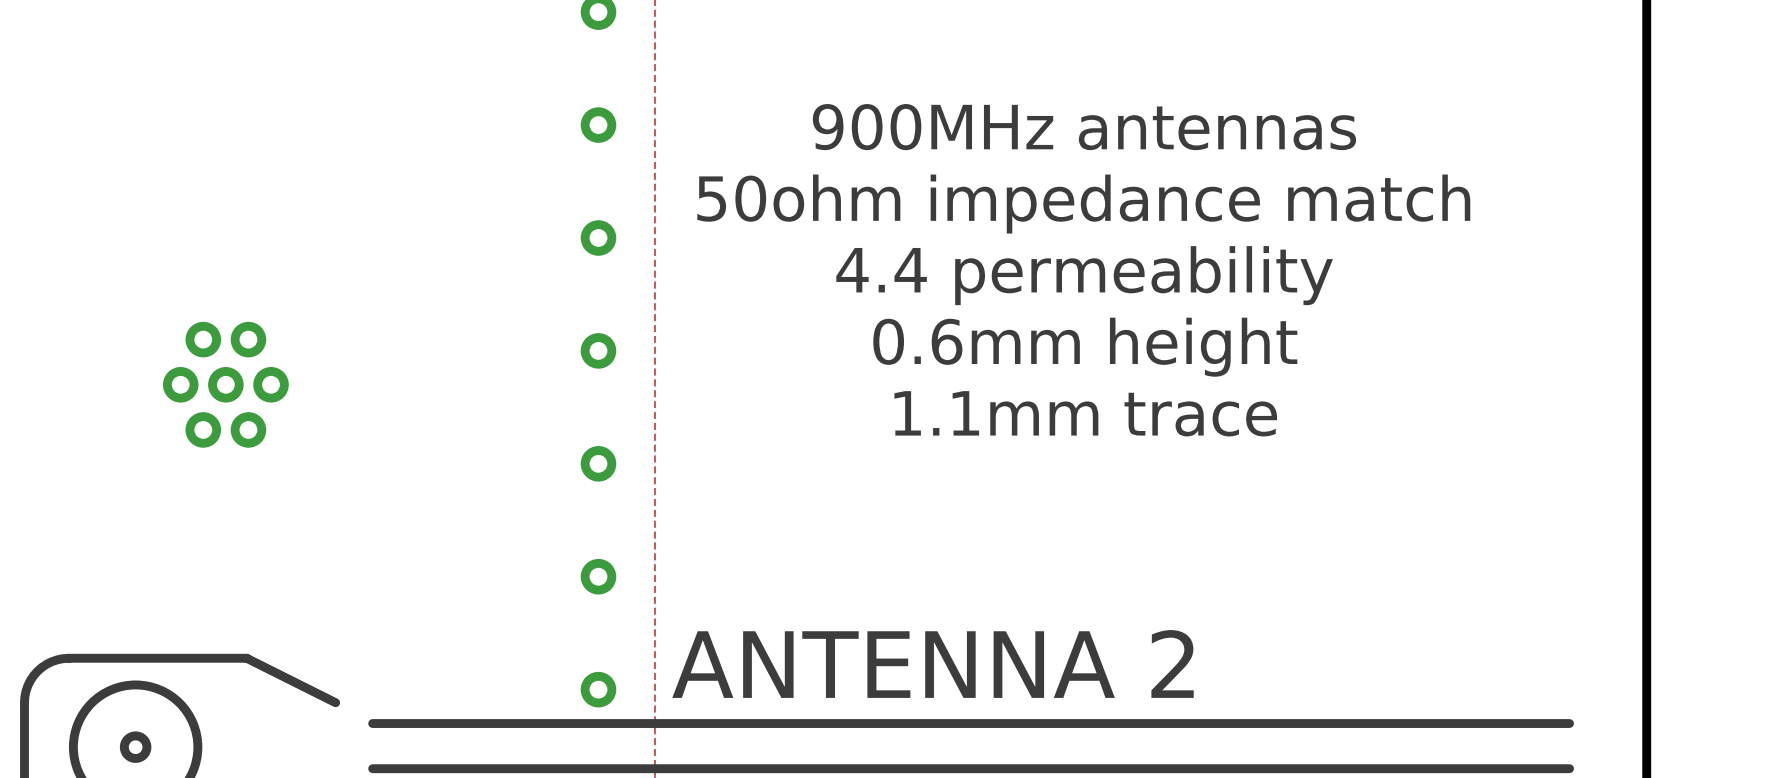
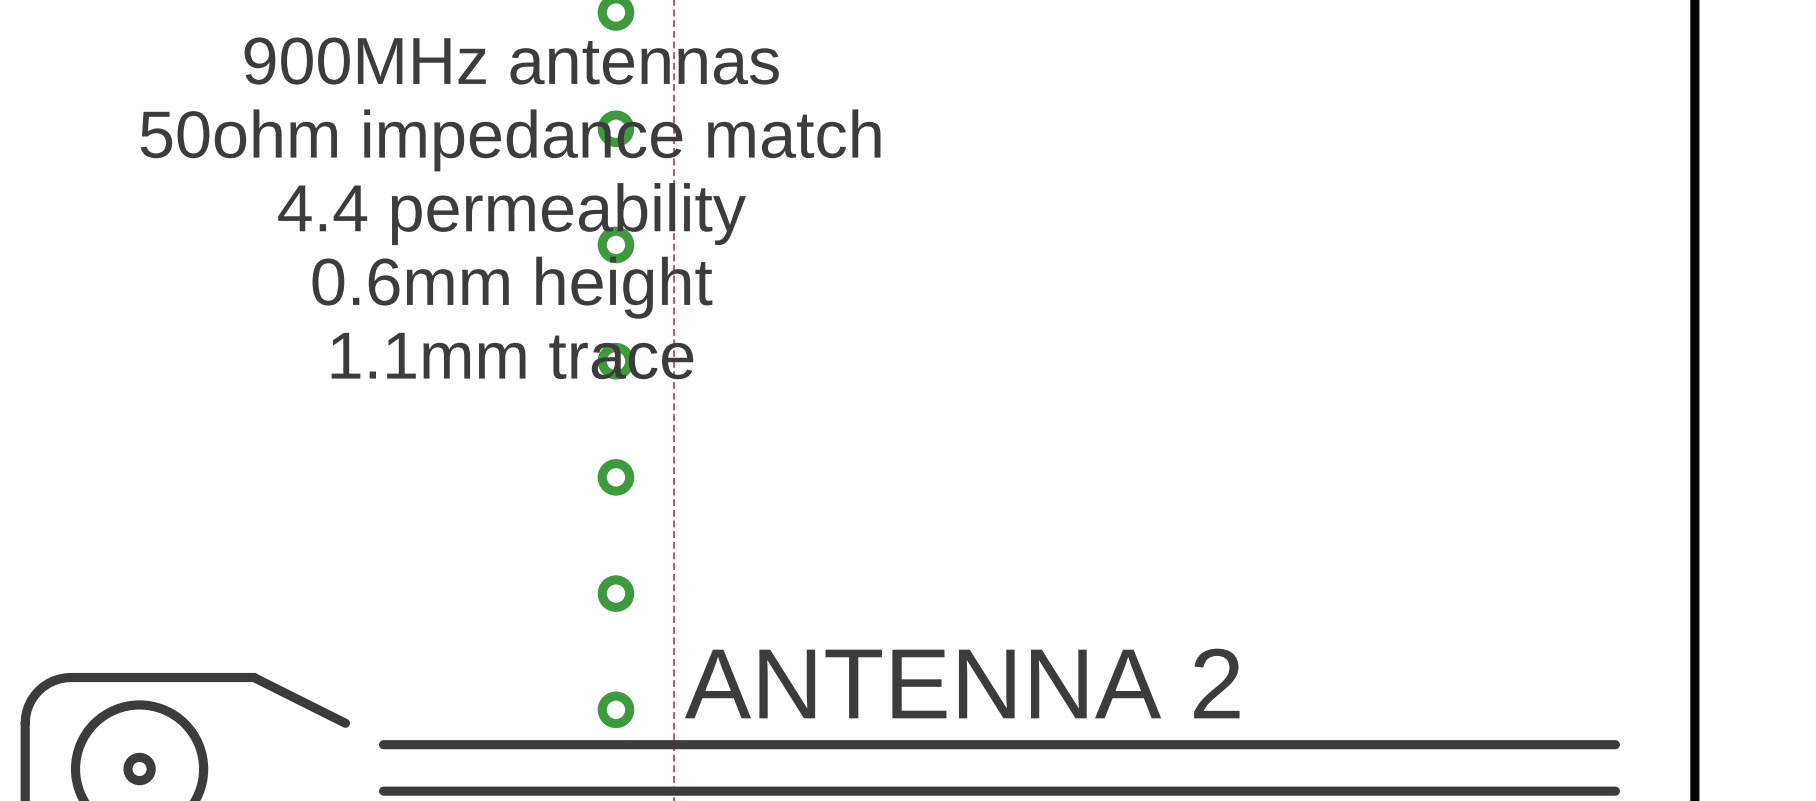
text position: 900MHz antennas (1084, 127) -> 900MHz antennas (511, 61)
text position: 50ohm impedance match (1083, 204) -> 50ohm impedance match (510, 140)
text position: 4.4 permeability (1084, 275) -> 4.4 permeability (512, 214)
via: (203, 339) -> none
via: (248, 339) -> none
text position: 0.6mm height (1085, 347) -> 0.6mm height (512, 287)
via: (180, 384) -> none
via: (225, 384) -> none
via: (271, 384) -> none
text position: 1.1mm trace (1085, 413) -> 1.1mm trace (512, 356)
via: (203, 429) -> none
via: (248, 429) -> none

